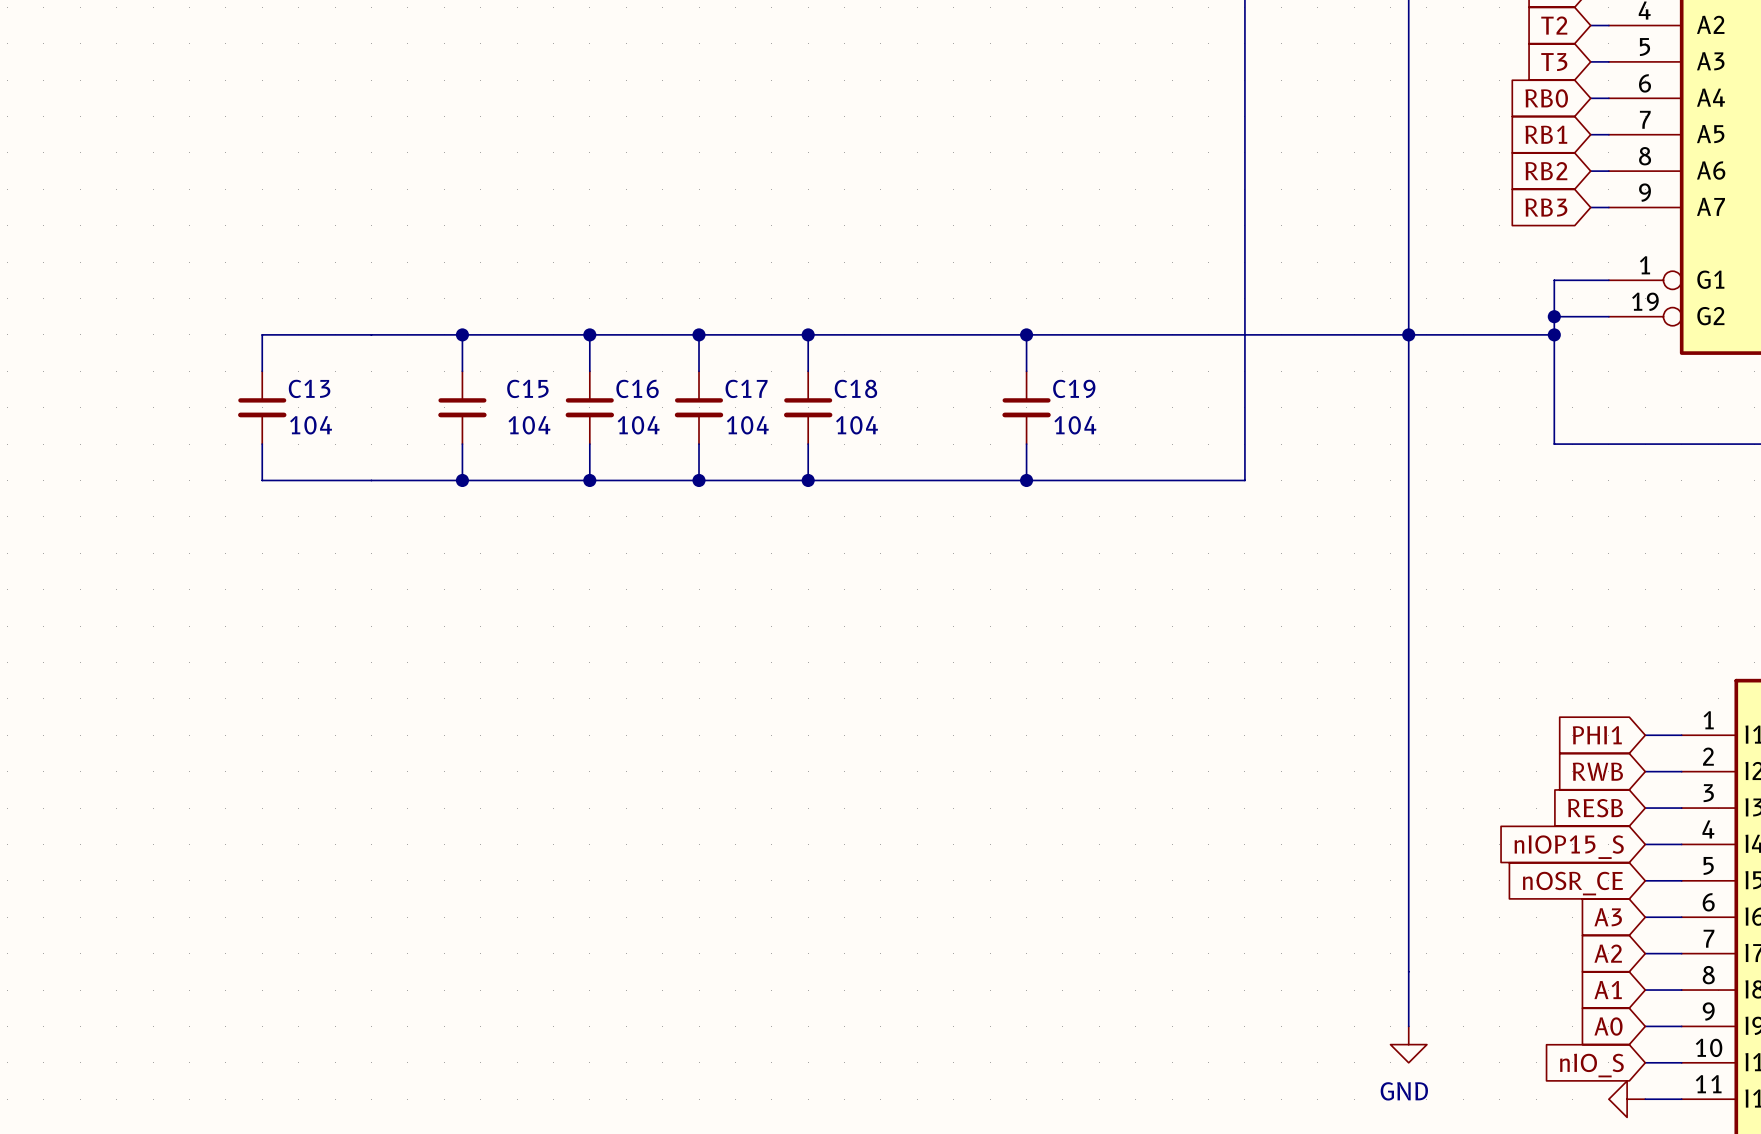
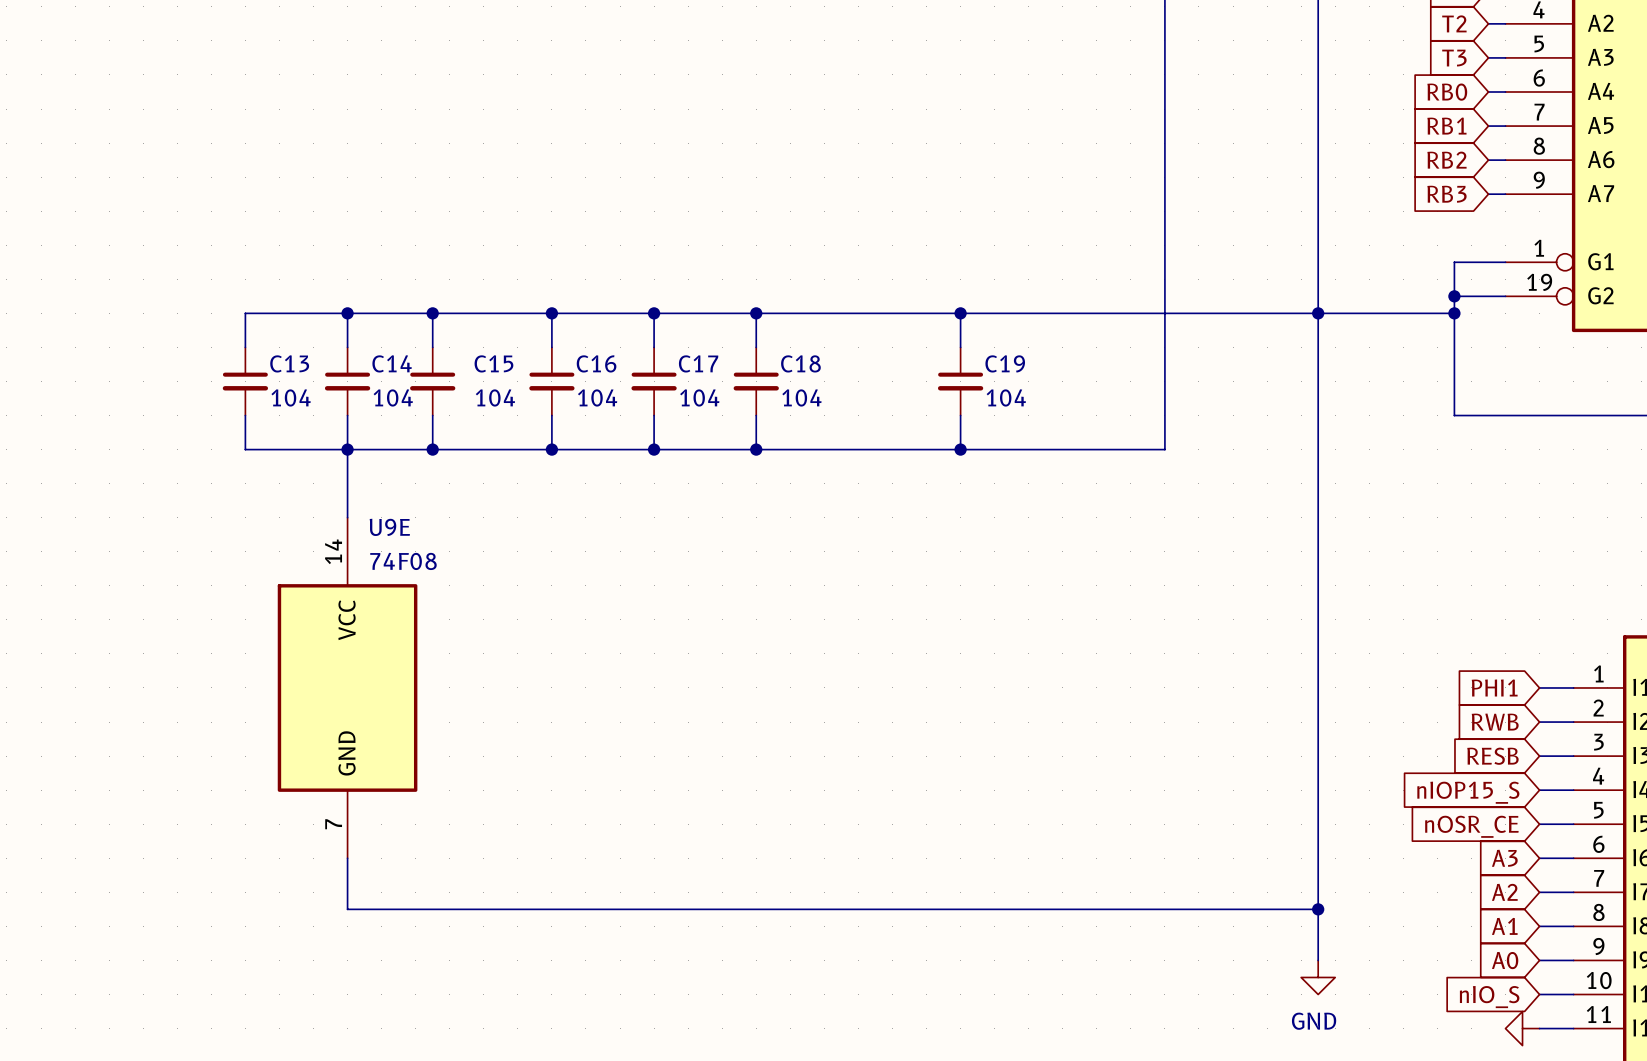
wire: none -> (347, 313) (347, 347)
junction: none -> (347, 313)
C14: none -> 104 (347, 381)
wire: none -> (347, 415) (347, 517)
junction: none -> (347, 449)
U9E: none -> 74F08 (347, 687)
wire: none -> (347, 858) (347, 909) (1318, 909)
junction: none -> (1318, 909)

